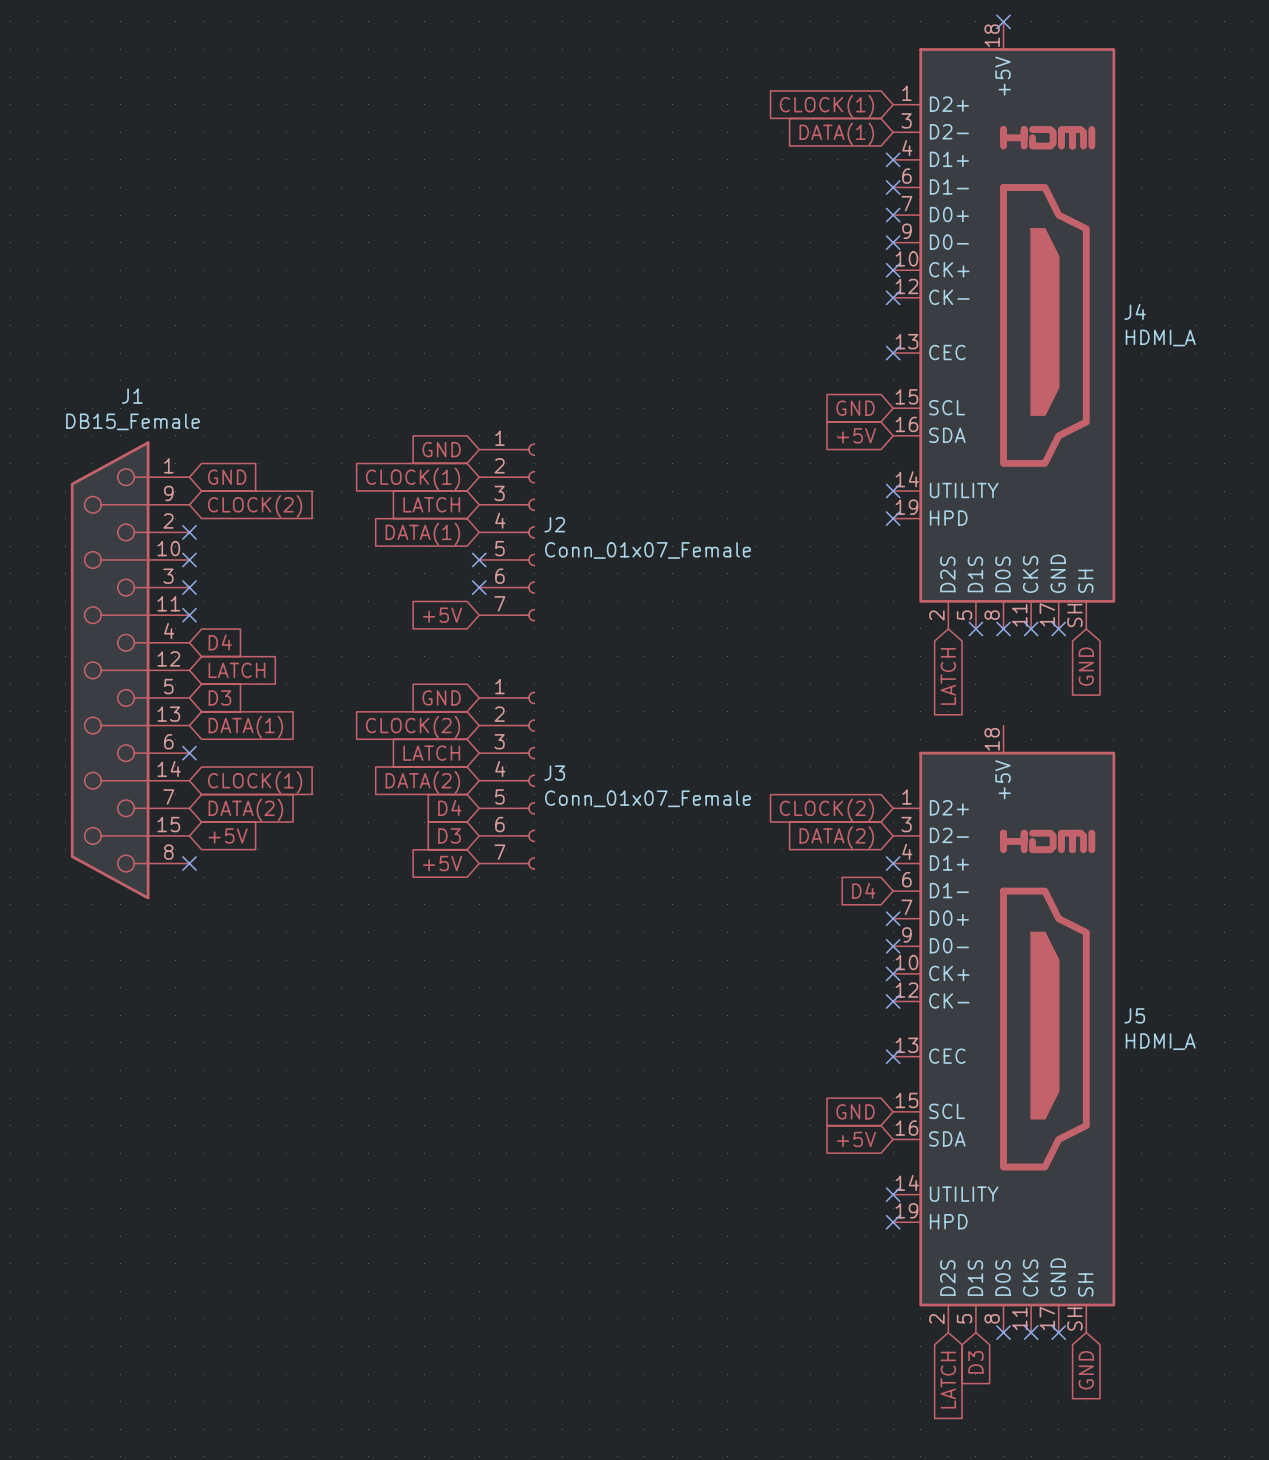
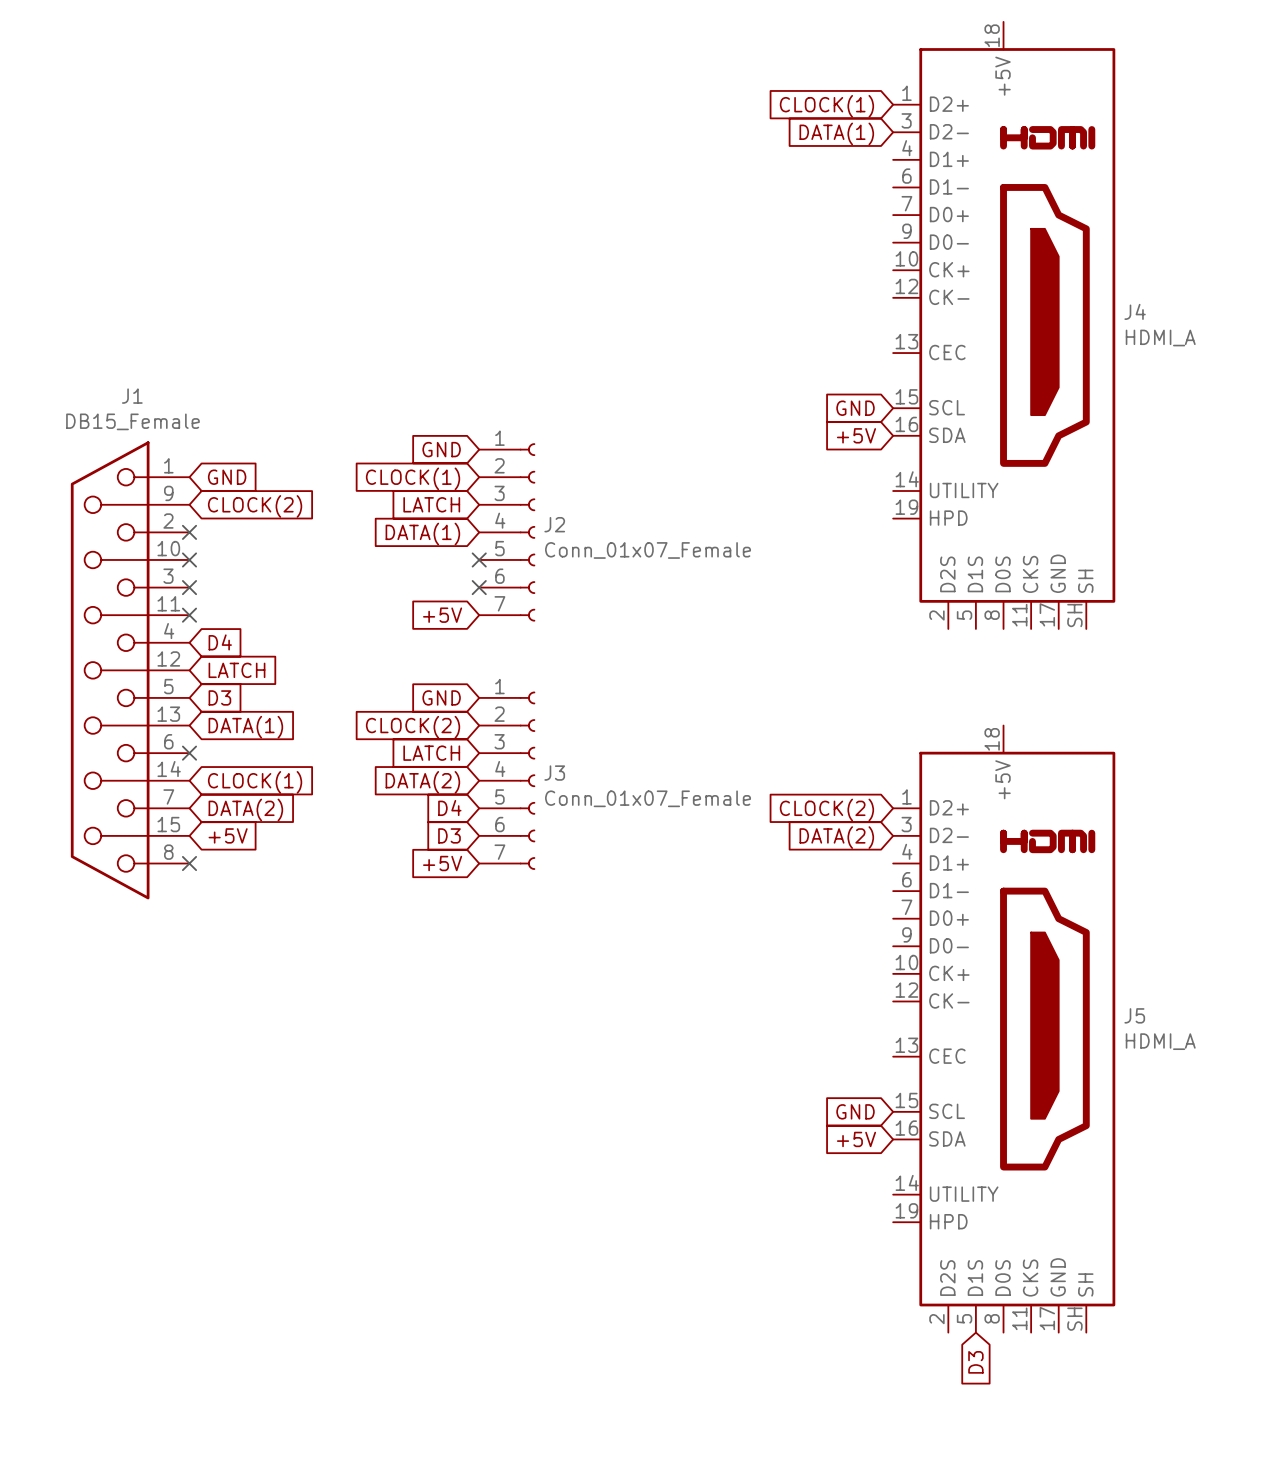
no-connect mark: (1003, 21) -> none
no-connect mark: (893, 159) -> none
no-connect mark: (893, 187) -> none
no-connect mark: (893, 215) -> none
no-connect mark: (893, 242) -> none
no-connect mark: (893, 270) -> none
no-connect mark: (893, 297) -> none
no-connect mark: (893, 353) -> none
no-connect mark: (893, 491) -> none
no-connect mark: (893, 518) -> none
no-connect mark: (975, 628) -> none
no-connect mark: (1003, 628) -> none
no-connect mark: (1031, 628) -> none
no-connect mark: (1058, 628) -> none
global label: GND (1086, 666) -> none
global label: LATCH (948, 676) -> none
no-connect mark: (893, 863) -> none
global label: D4 (863, 890) -> none
no-connect mark: (893, 918) -> none
no-connect mark: (893, 946) -> none
no-connect mark: (893, 973) -> none
no-connect mark: (893, 1001) -> none
no-connect mark: (893, 1056) -> none
no-connect mark: (893, 1194) -> none
no-connect mark: (893, 1222) -> none
no-connect mark: (1003, 1332) -> none
no-connect mark: (1031, 1332) -> none
no-connect mark: (1058, 1332) -> none
global label: GND (1086, 1370) -> none
global label: LATCH (948, 1380) -> none

